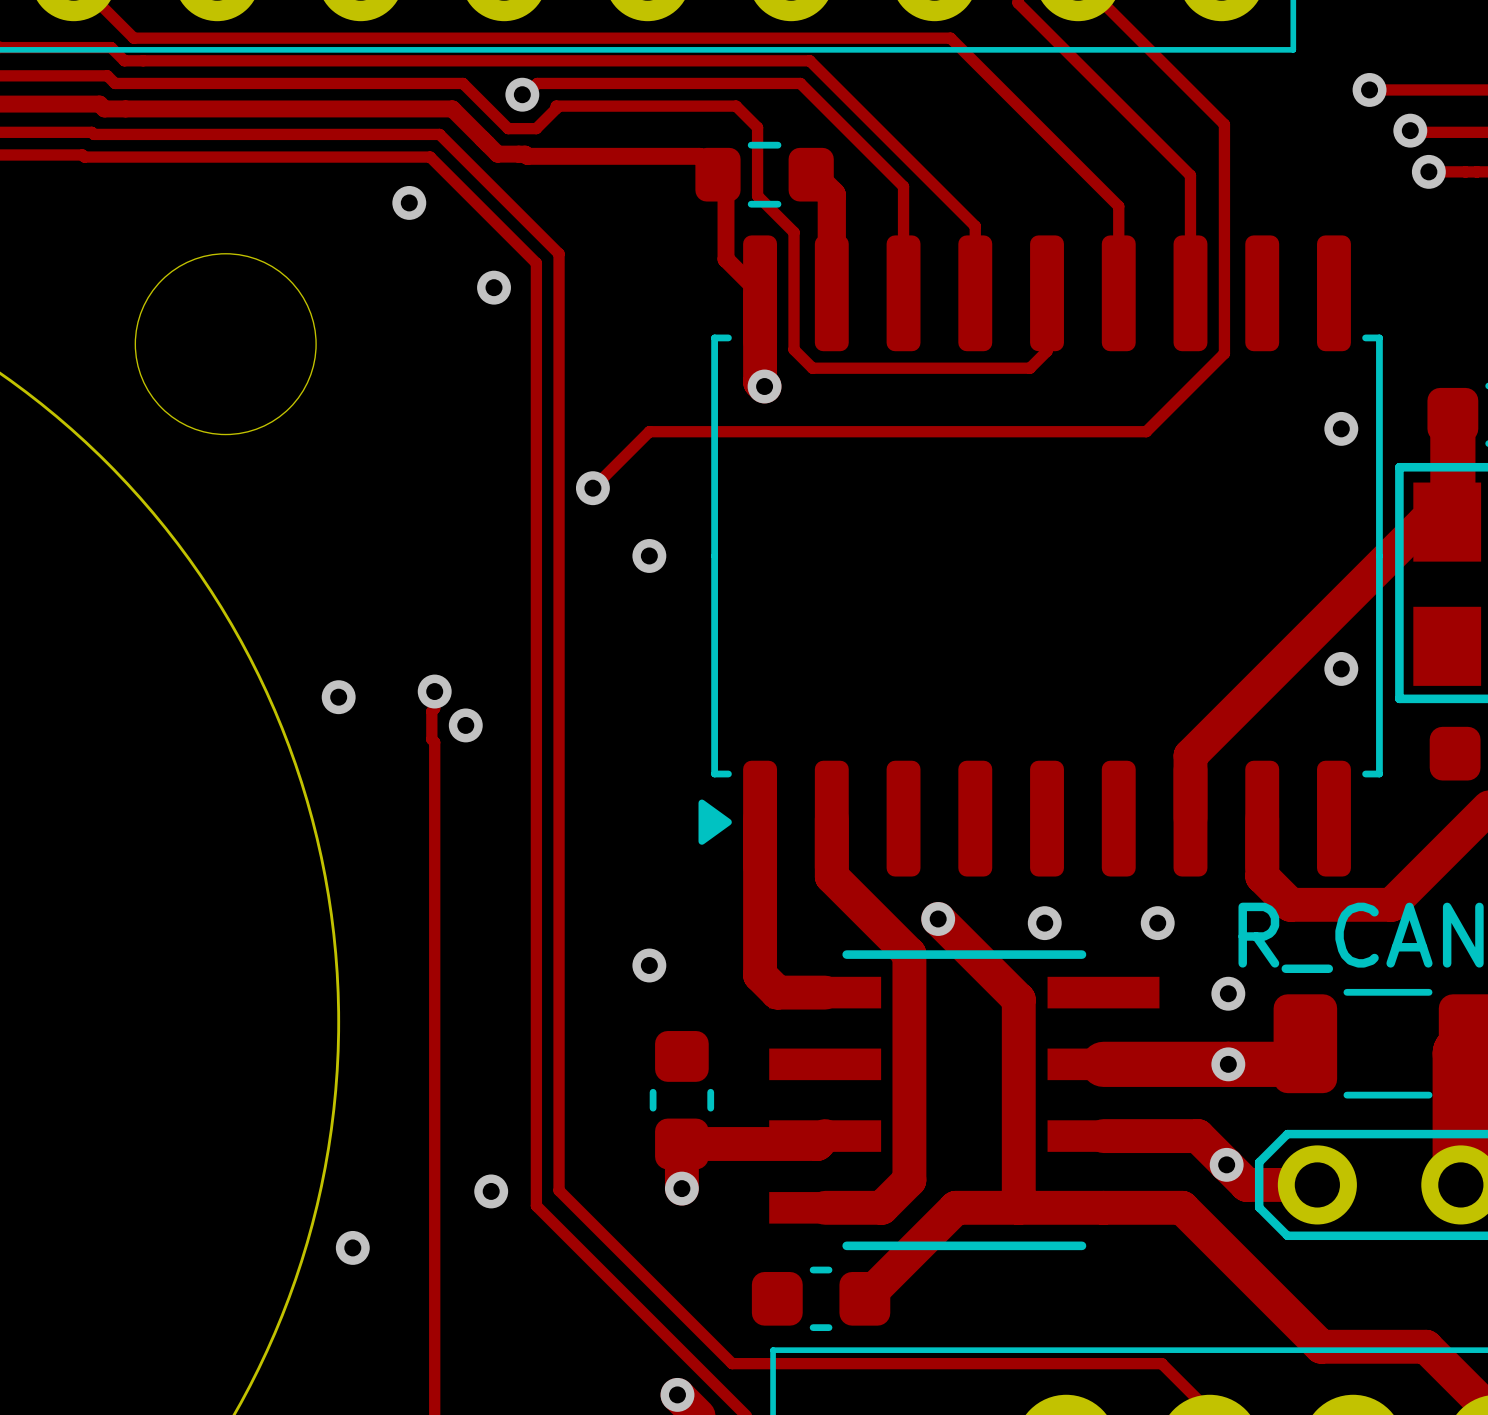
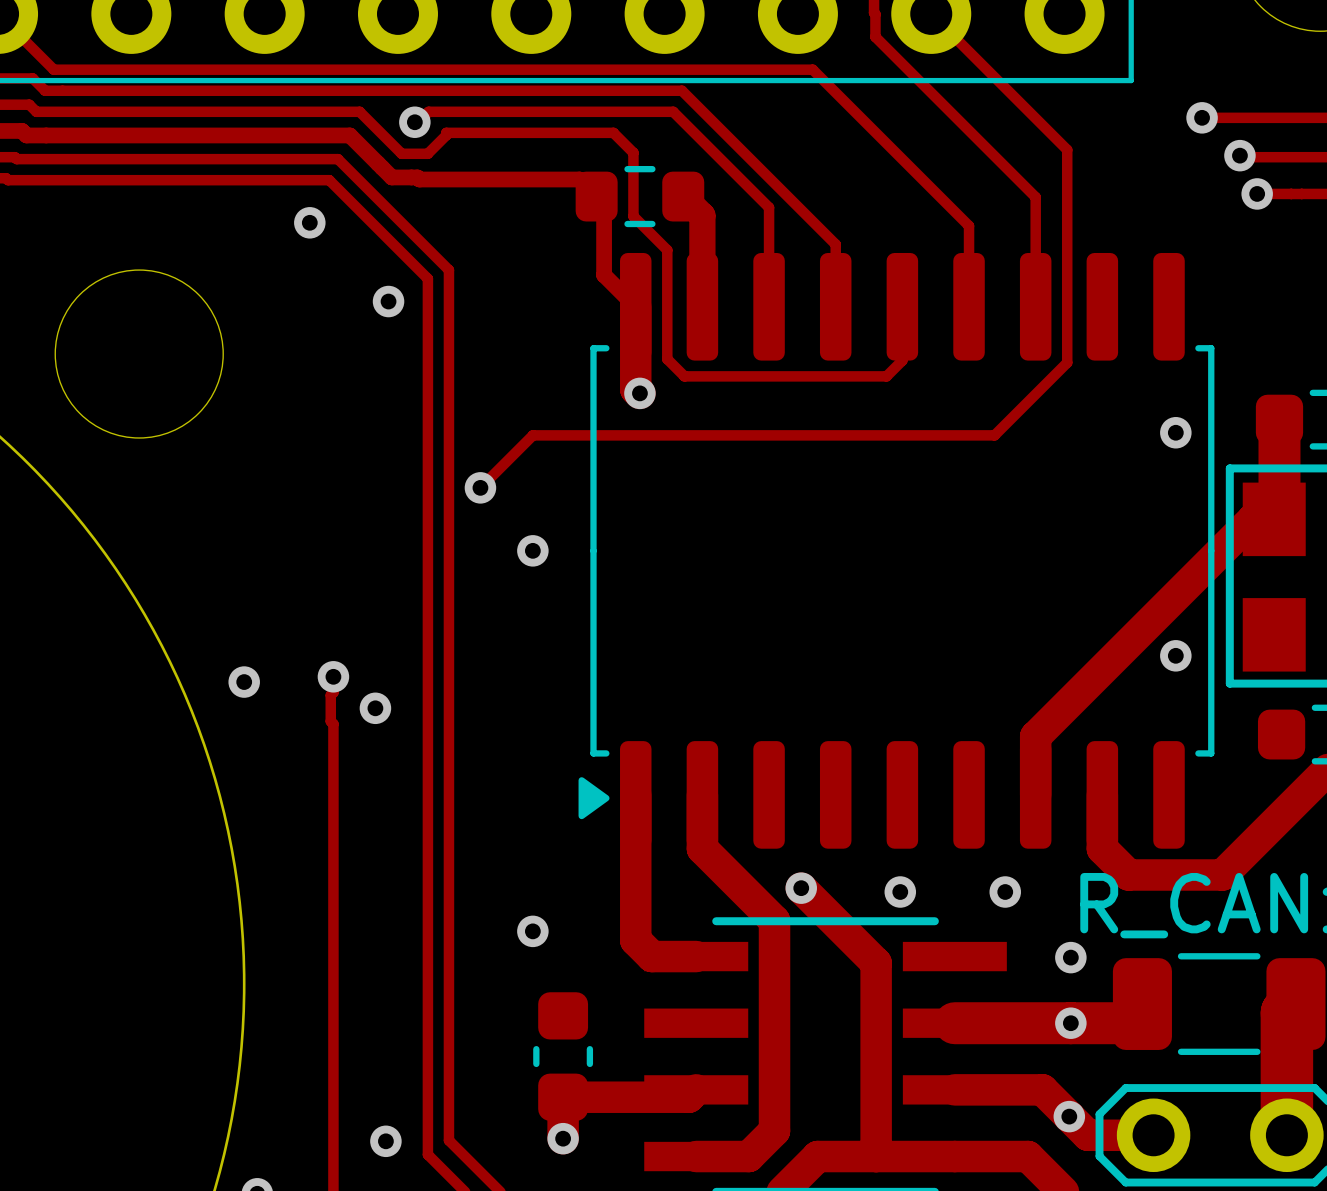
via position: (465, 725) -> (375, 708)

